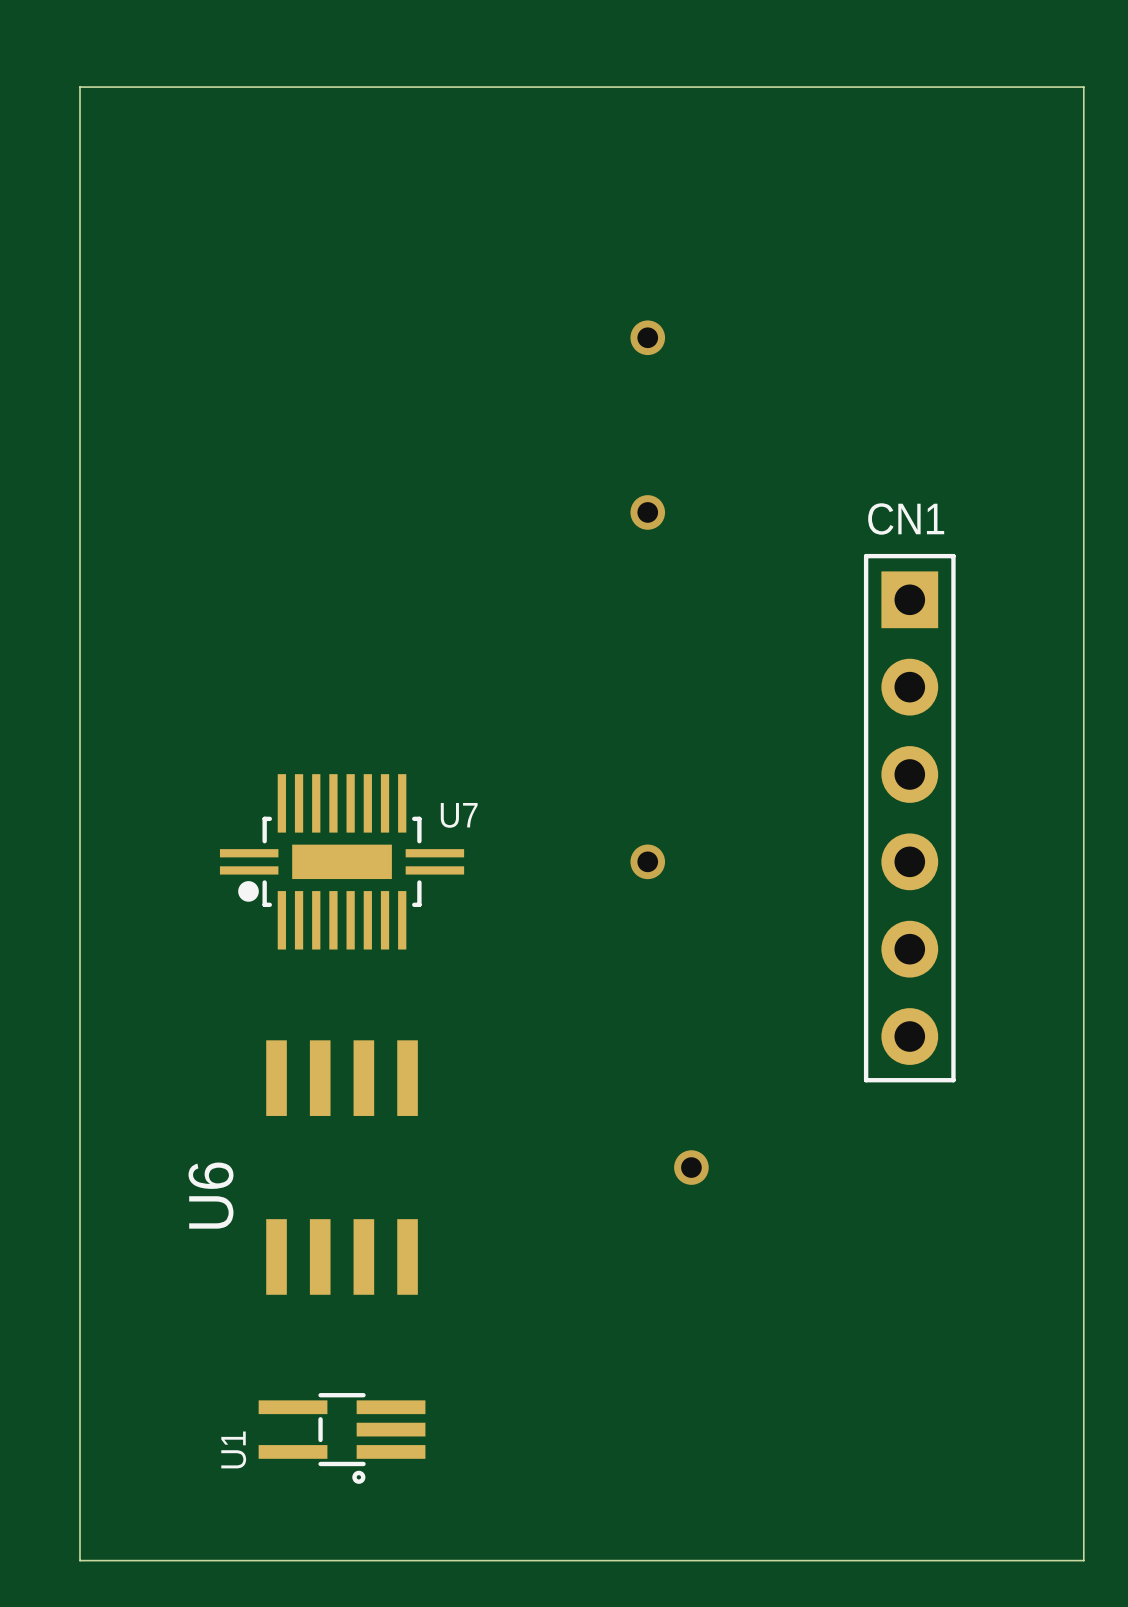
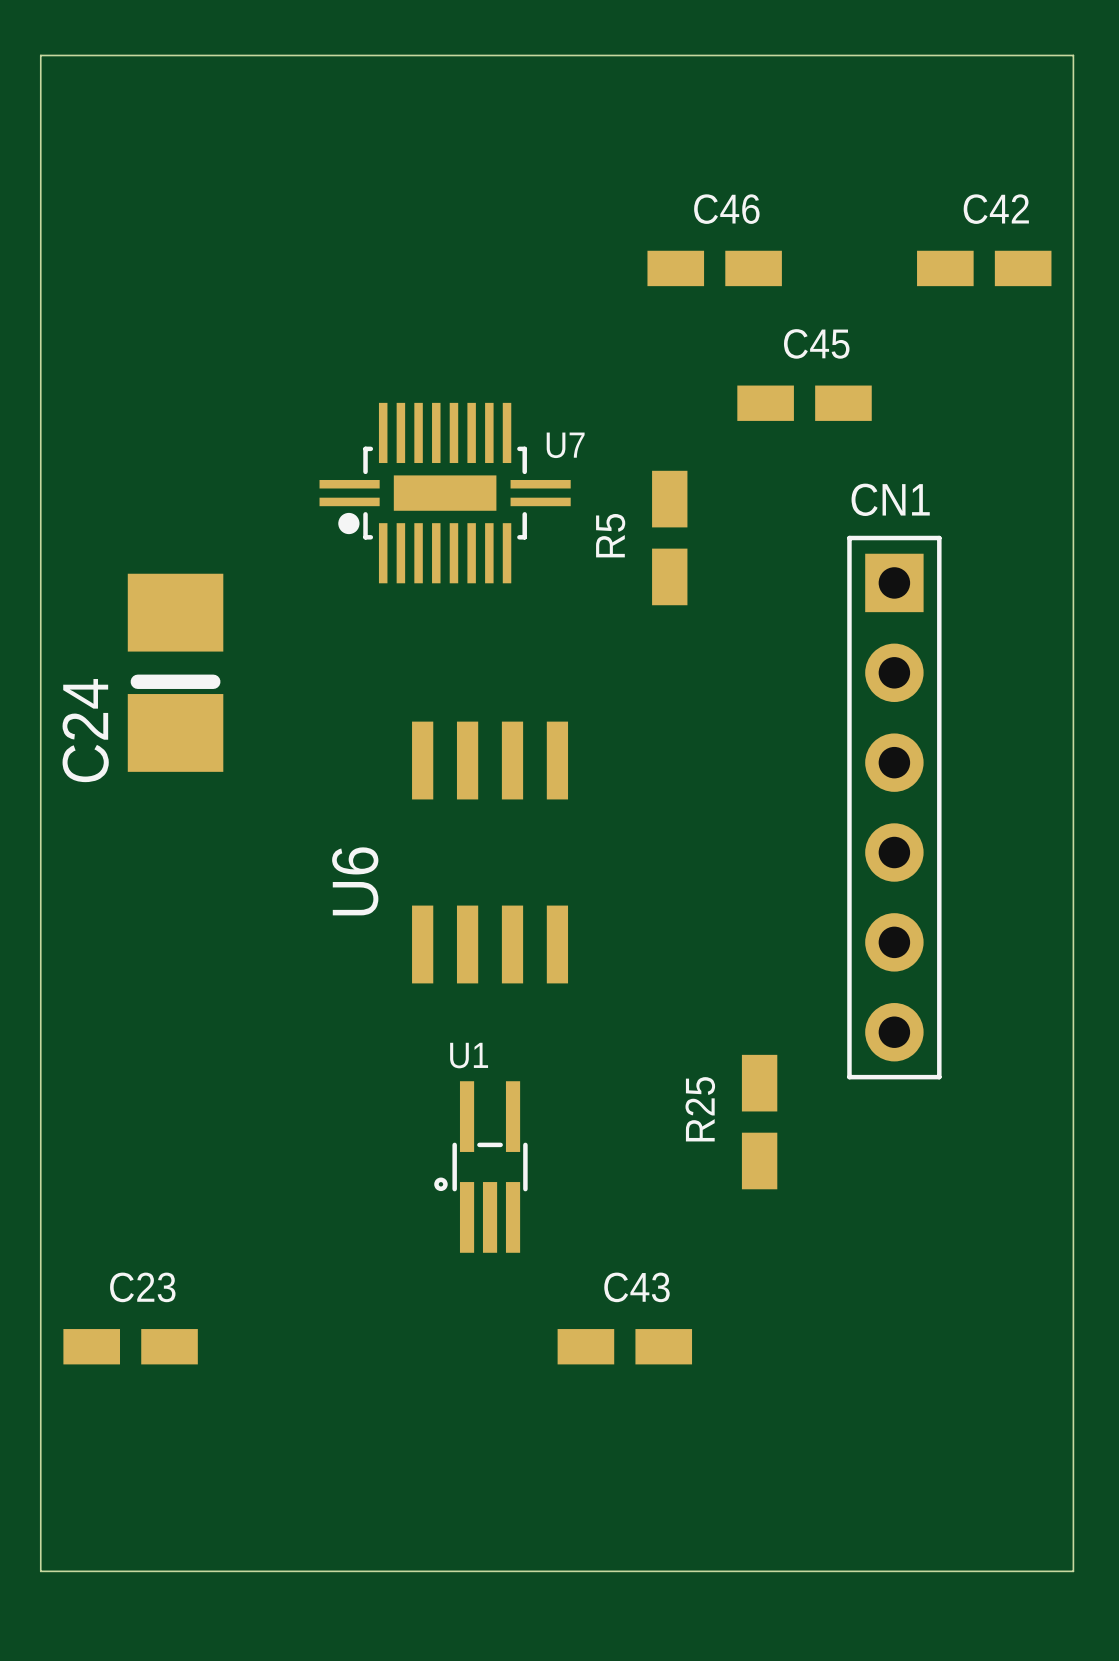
C46: none -> (714, 268)
C42: none -> (984, 268)
via: (647, 337) -> none
C45: none -> (804, 403)
via: (647, 512) -> none
R5: none -> (669, 538)
C24: none -> (175, 672)
U7 position: (342, 861) -> (445, 493)
via: (647, 861) -> none
R25: none -> (759, 1122)
U6 position: (342, 1167) -> (490, 852)
via: (691, 1167) -> none
C23: none -> (130, 1346)
C43: none -> (624, 1346)
U1 rotation: 0° (342, 1438) -> 90° clockwise (480, 1167)
U1 position: (342, 1438) -> (480, 1167)

